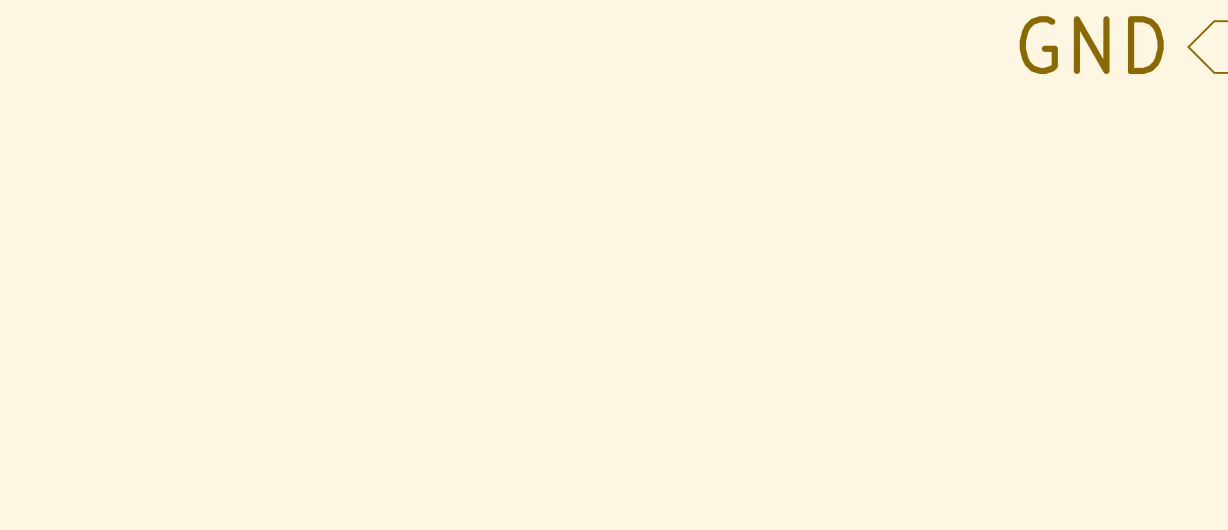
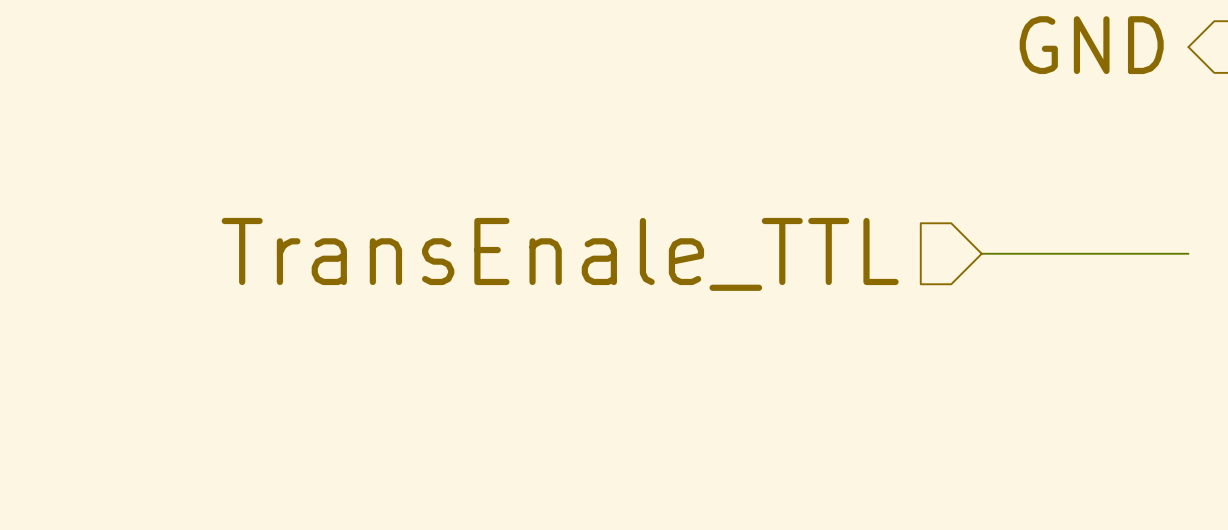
wire: none -> (981, 253) (1188, 253)
hierarchical label: none -> TransEnale_TTL (560, 254)

